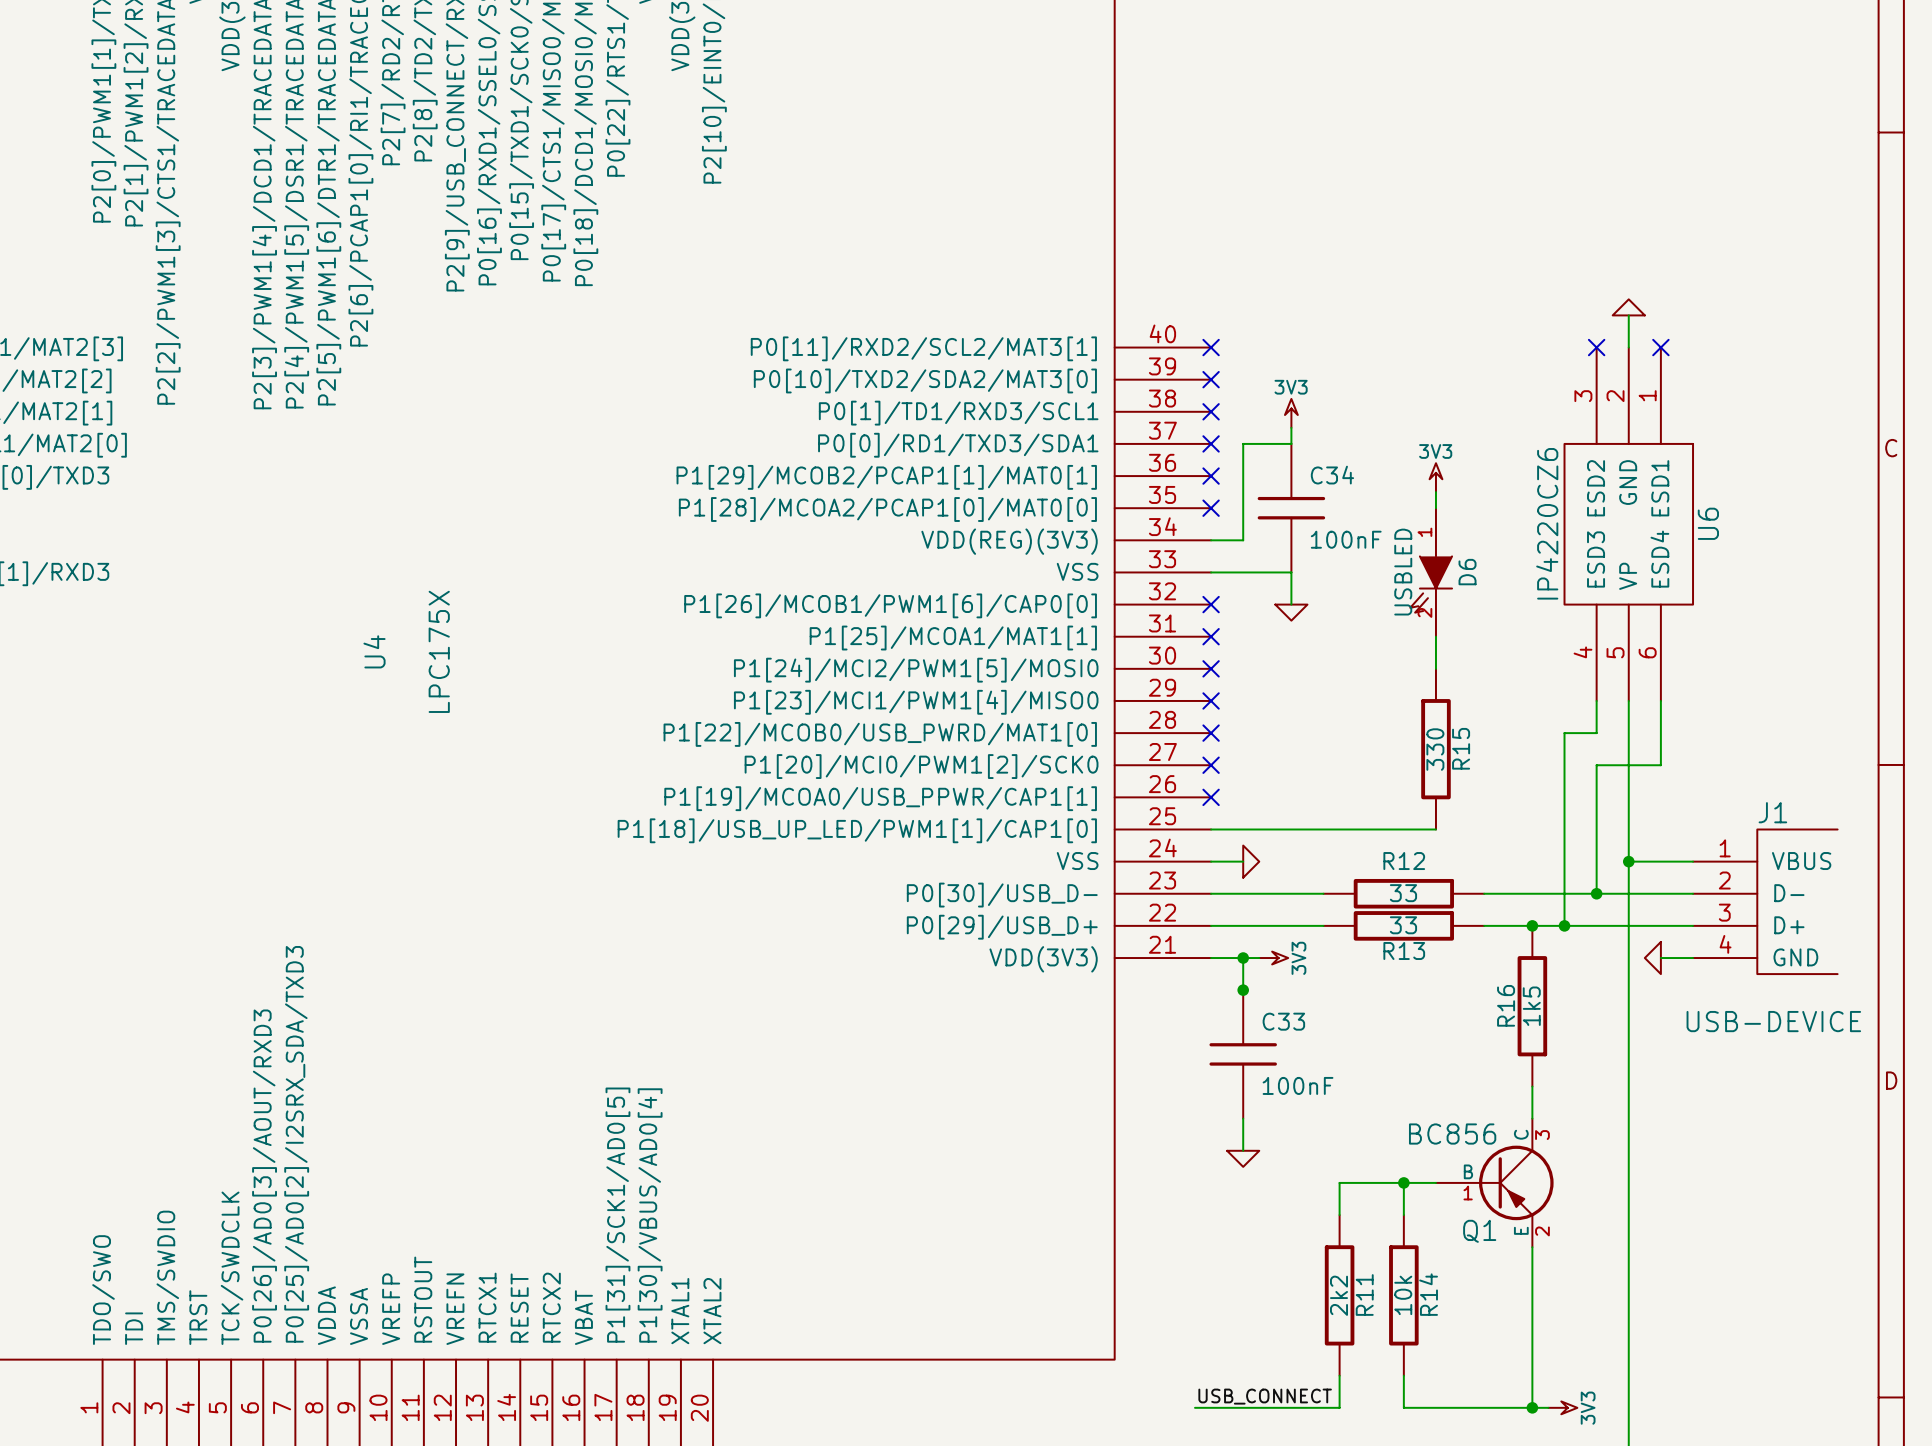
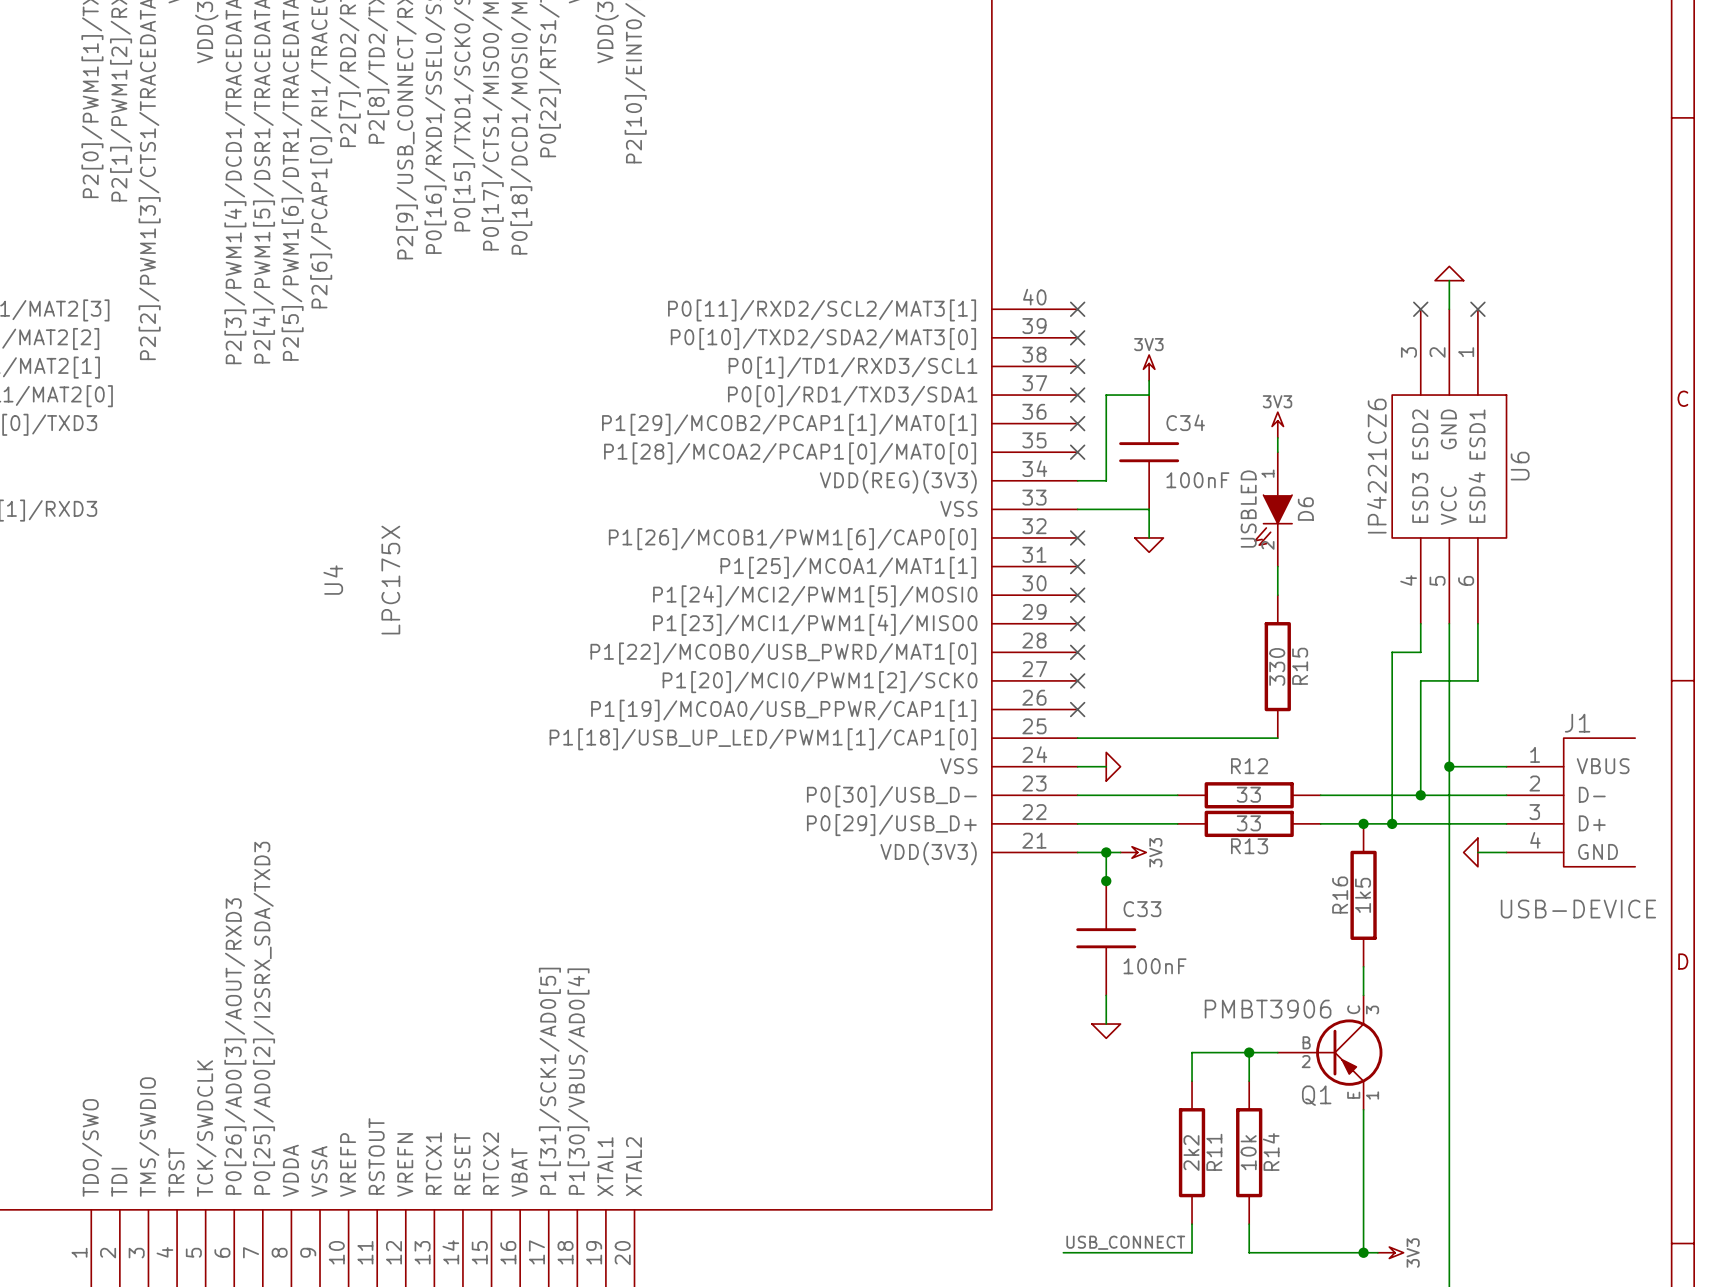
U6 value: IP4220CZ6 (1547, 523) -> IP4221CZ6 (1376, 466)
U6 pin name: VP (1628, 576) -> VCC (1448, 505)
Q1 value: BC856 (1452, 1134) -> PMBT3906 (1268, 1009)
Q1 pin number: 1 (1468, 1193) -> 2 (1306, 1061)
Q1 pin number: 2 (1542, 1231) -> 1 (1372, 1095)

